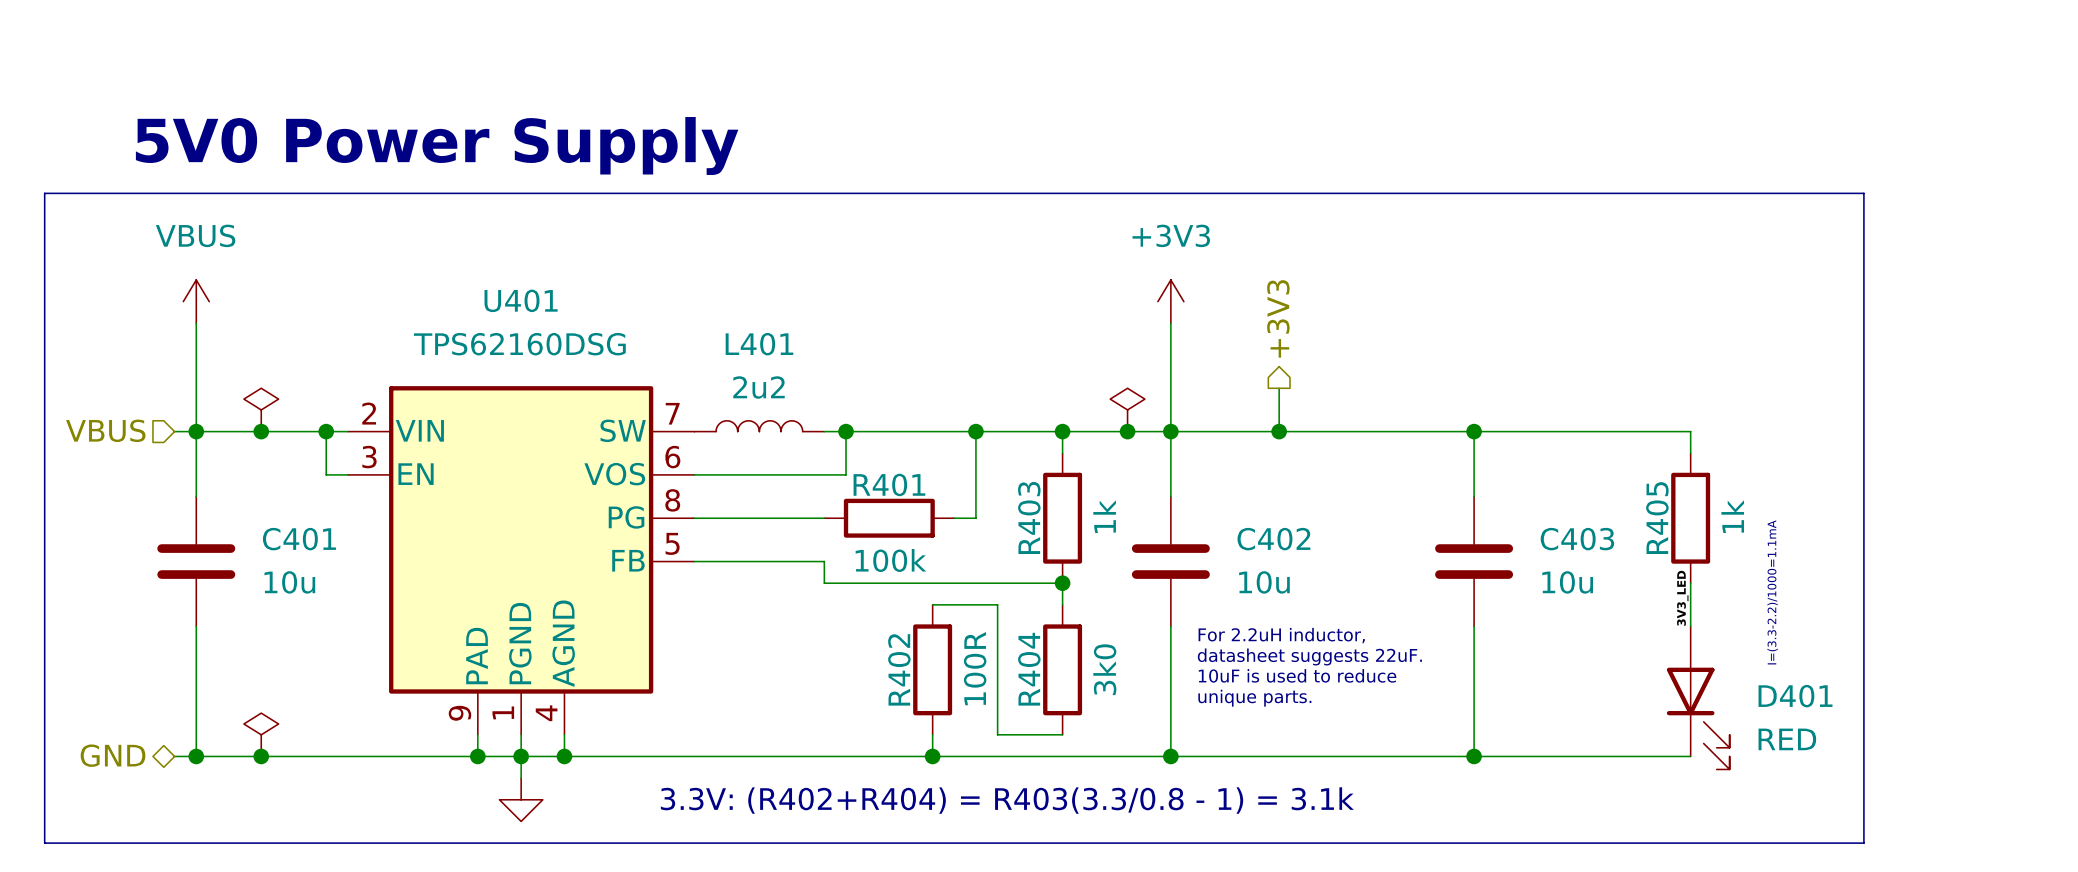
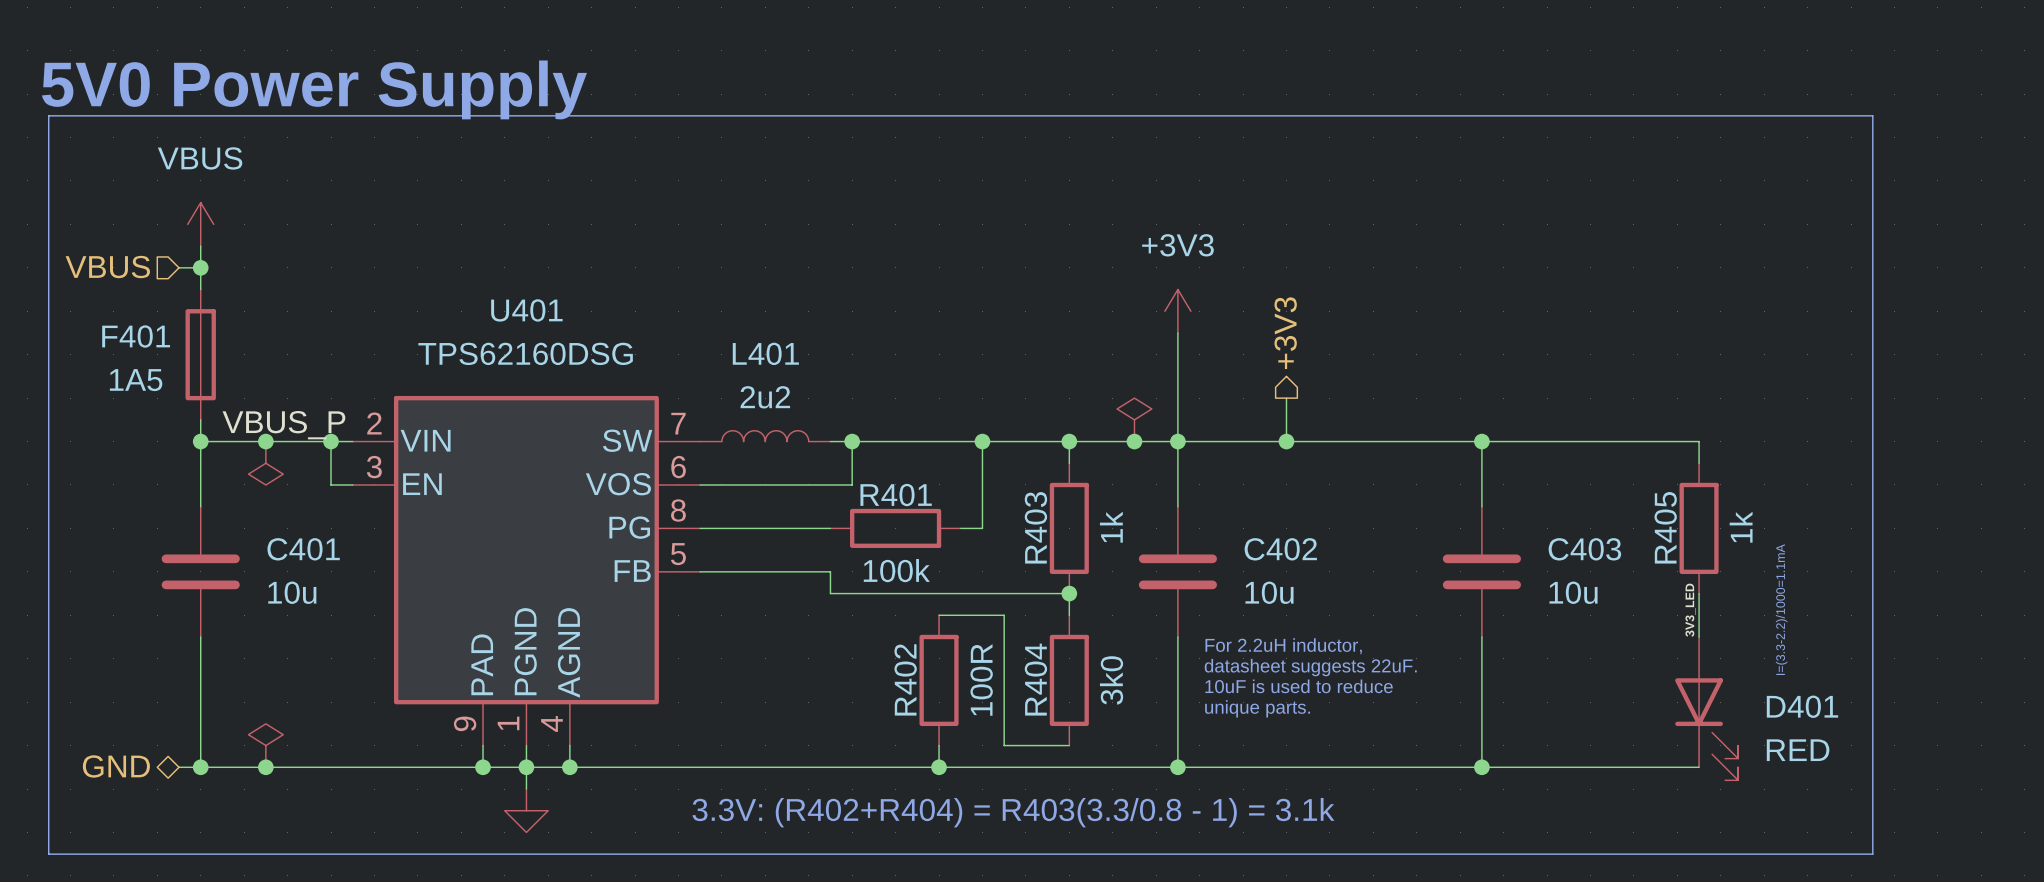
text position: 5V0 Power Supply (437, 145) -> 5V0 Power Supply (314, 89)
line: (44, 193) (1863, 193) -> (48, 202) (48, 115) (1872, 115) (1872, 202)
wire: none -> (200, 246) (200, 289)
junction: none -> (200, 267)
power symbol position: VBUS (196, 301) -> VBUS (200, 224)
F401: none -> 1A5 (200, 354)
power symbol rotation: 0° (261, 409) -> 180° (265, 463)
power symbol position: (261, 409) -> (265, 463)
label: none -> VBUS_P (283, 425)
hierarchical label position: VBUS (105, 430) -> VBUS (107, 267)
wire: (174, 431) (196, 431) -> (179, 267) (200, 267)

